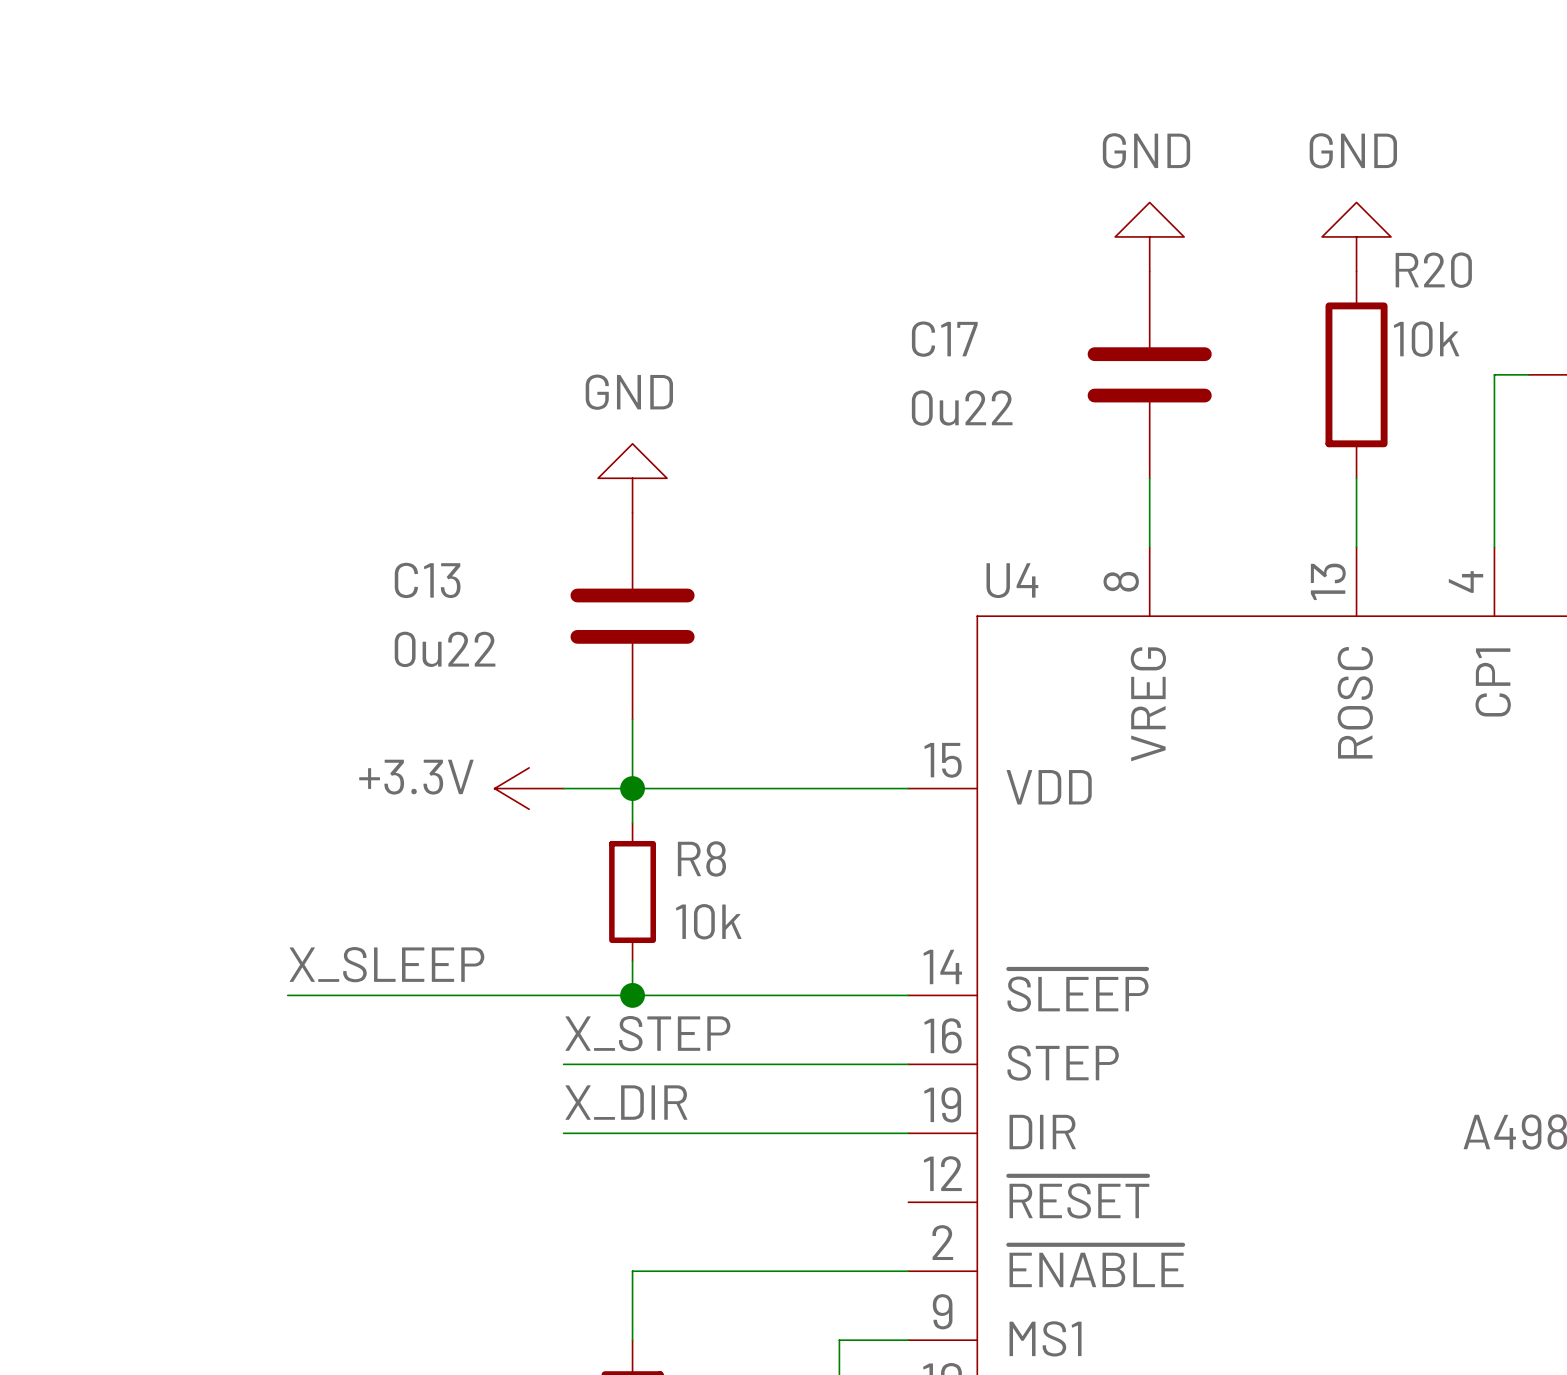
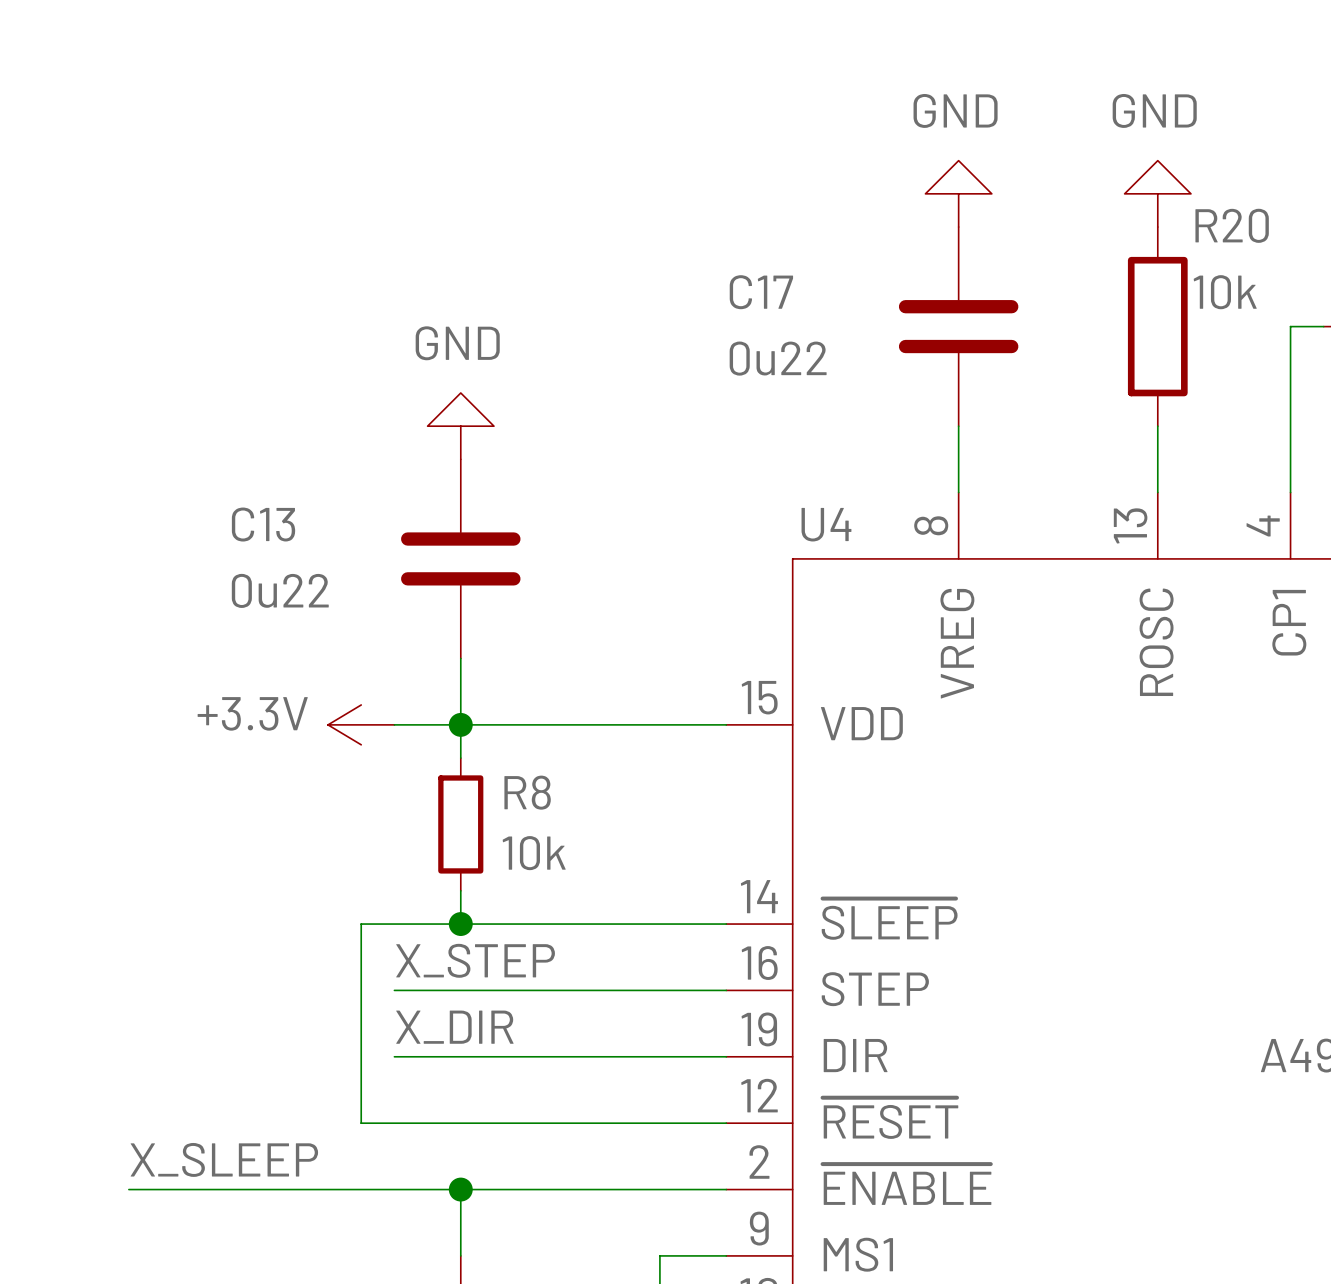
label position: X_SLEEP (386, 964) -> X_SLEEP (224, 1159)
wire: (287, 995) (529, 995) -> (726, 1123) (361, 1123) (361, 924)
wire: none -> (128, 1189) (460, 1189)
junction: none -> (460, 1189)

